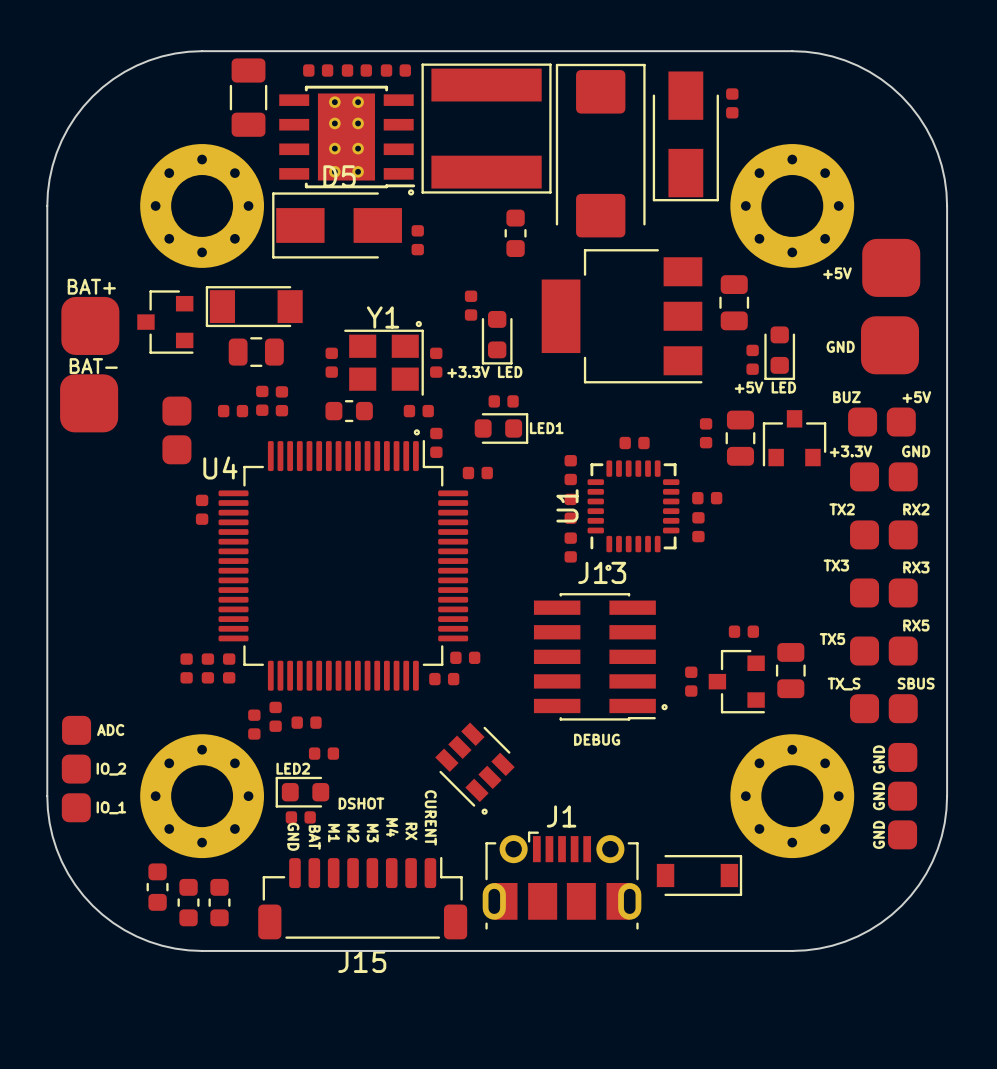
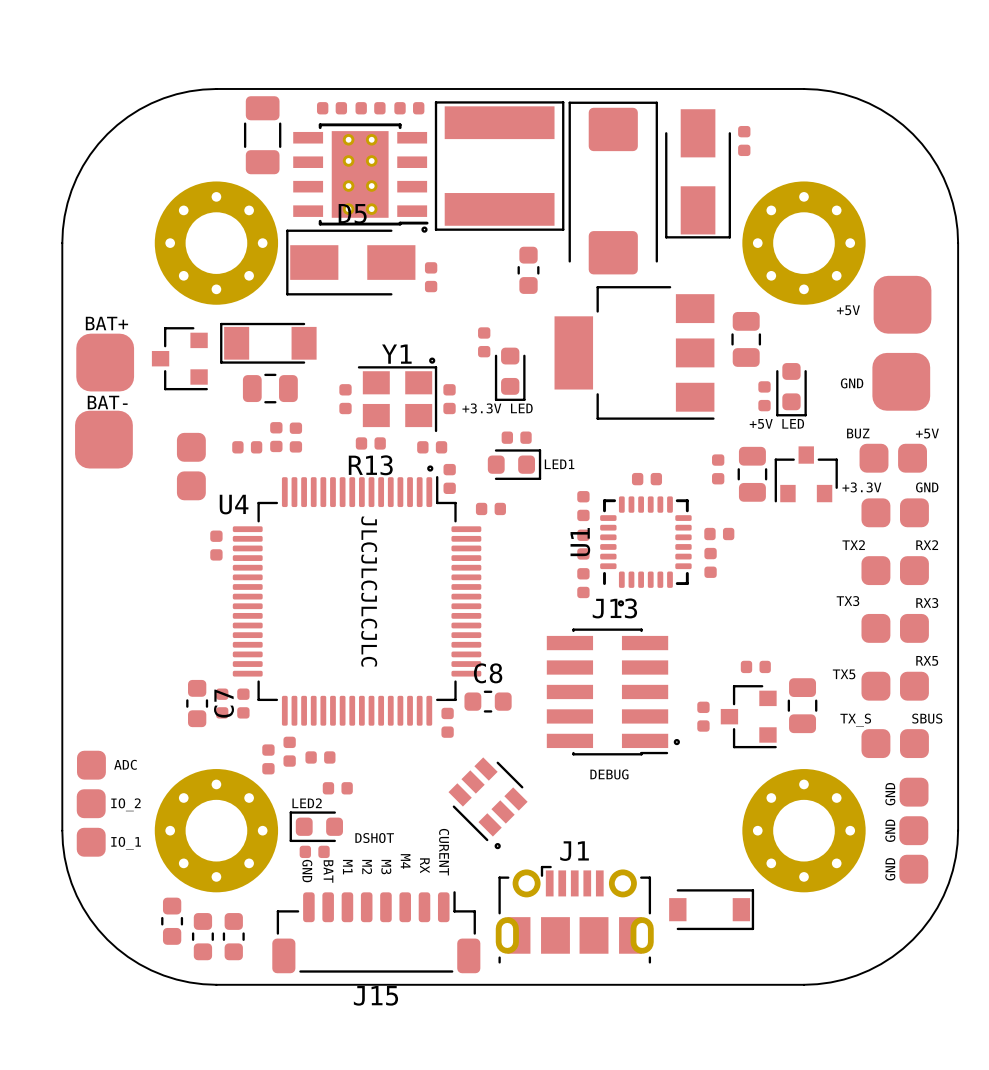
R13: none -> (370, 443)
part: (349, 411) -> none
text: none -> JLCJLCJLCJLC (369, 591)
part: (465, 657) -> none
C8: none -> (488, 701)
C7: none -> (197, 703)
part: (186, 668) -> none
part rotation: 0° (444, 679) -> 90° clockwise (447, 722)

